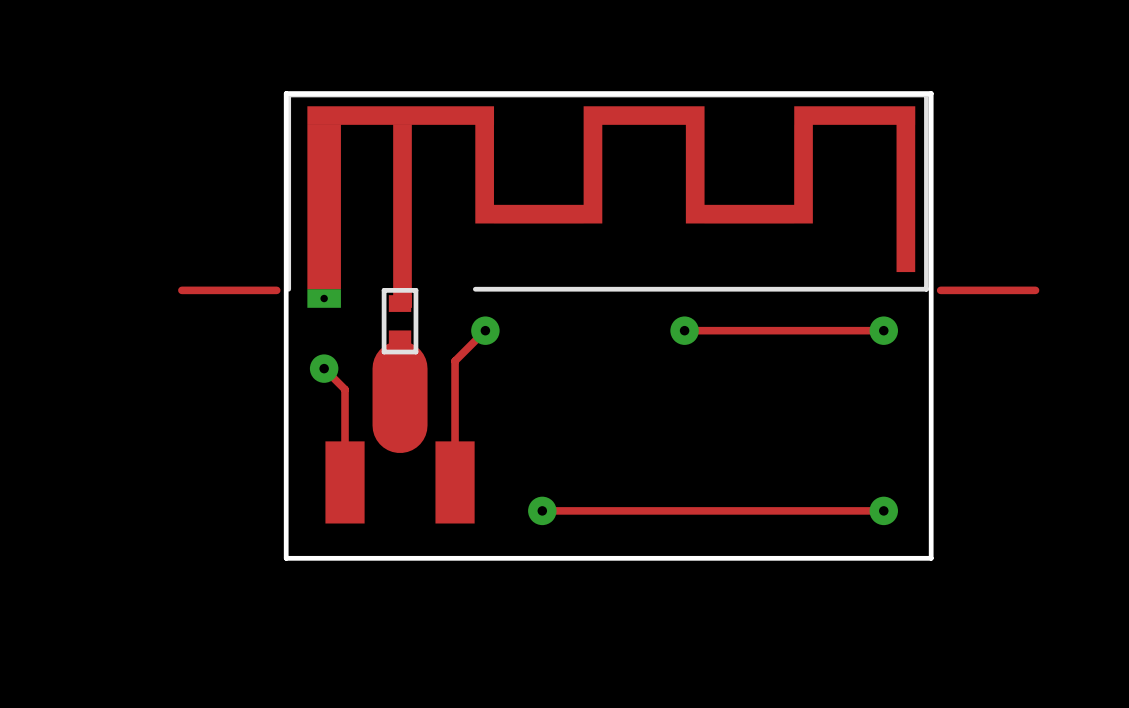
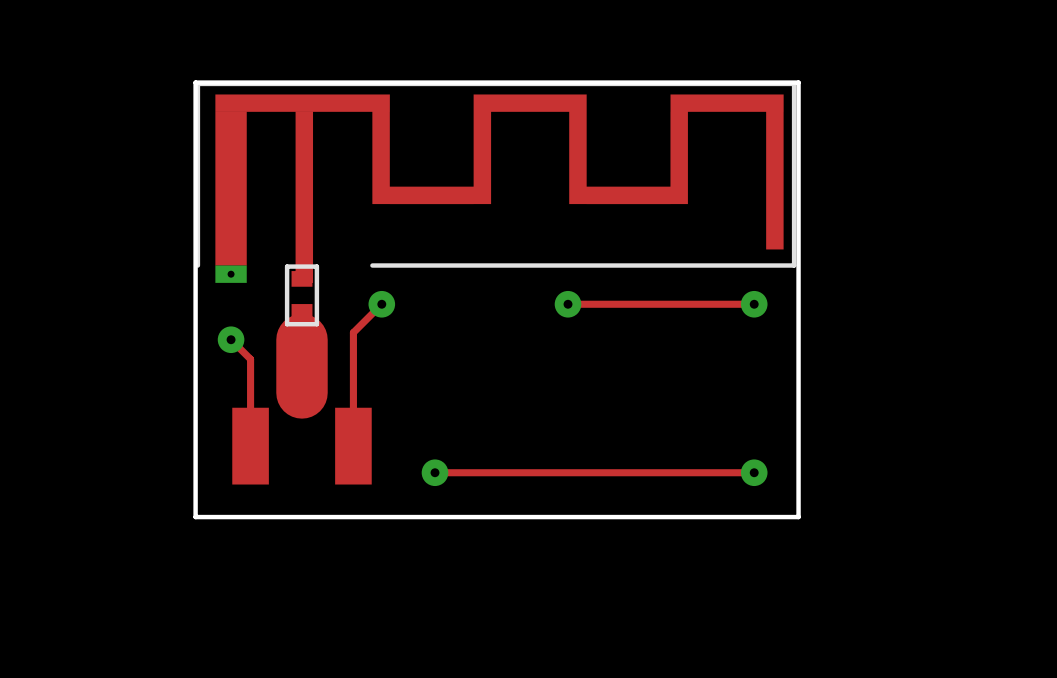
track: (181, 290) (276, 290) -> none
track: (940, 290) (1035, 290) -> none

